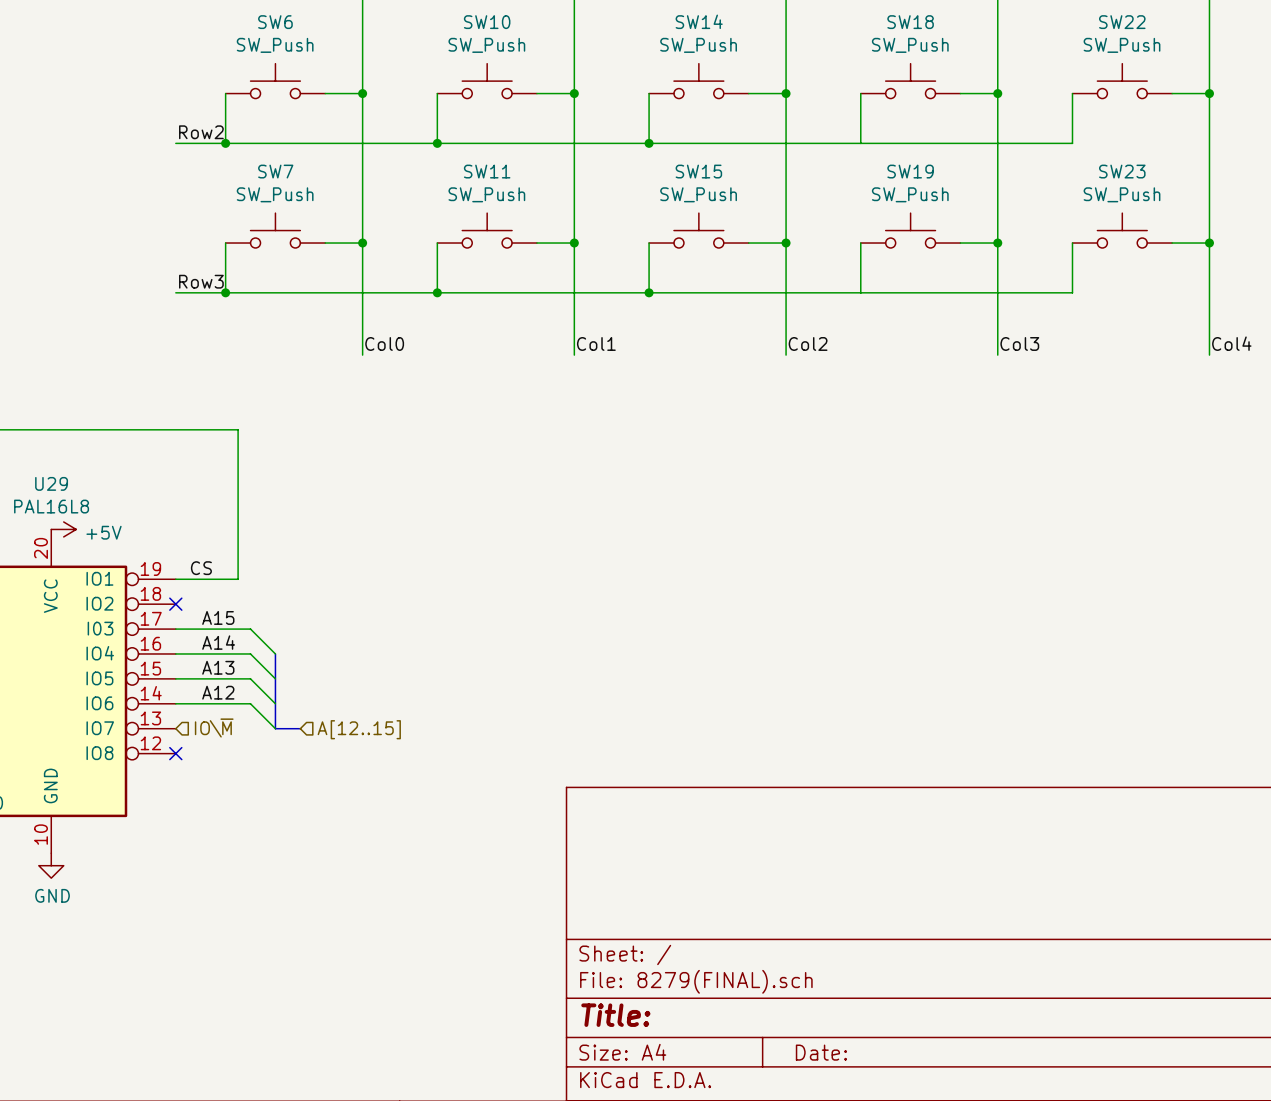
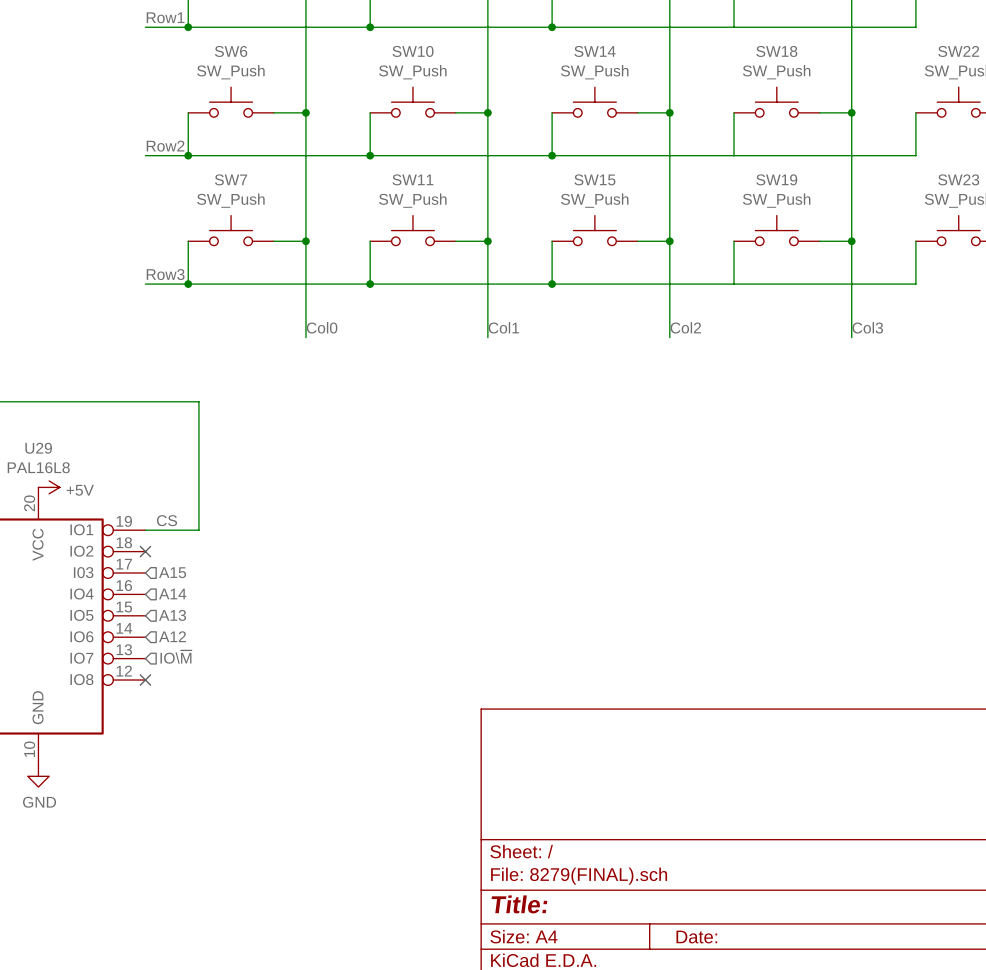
label: A15 (218, 617) -> none
hierarchical label: none -> A15 (172, 572)
wire: (175, 629) (250, 629) (275, 653) -> none
label: A14 (218, 642) -> none
wire: (175, 653) (250, 653) (275, 678) -> none
hierarchical label: none -> A14 (172, 594)
bus: (275, 653) (275, 728) (300, 728) -> none
label: A13 (218, 667) -> none
wire: (175, 678) (250, 678) (275, 703) -> none
hierarchical label: none -> A13 (172, 615)
label: A12 (218, 692) -> none
wire: (175, 703) (250, 703) (275, 728) -> none
hierarchical label: none -> A12 (172, 636)
hierarchical label: A[12..15] (359, 729) -> none

